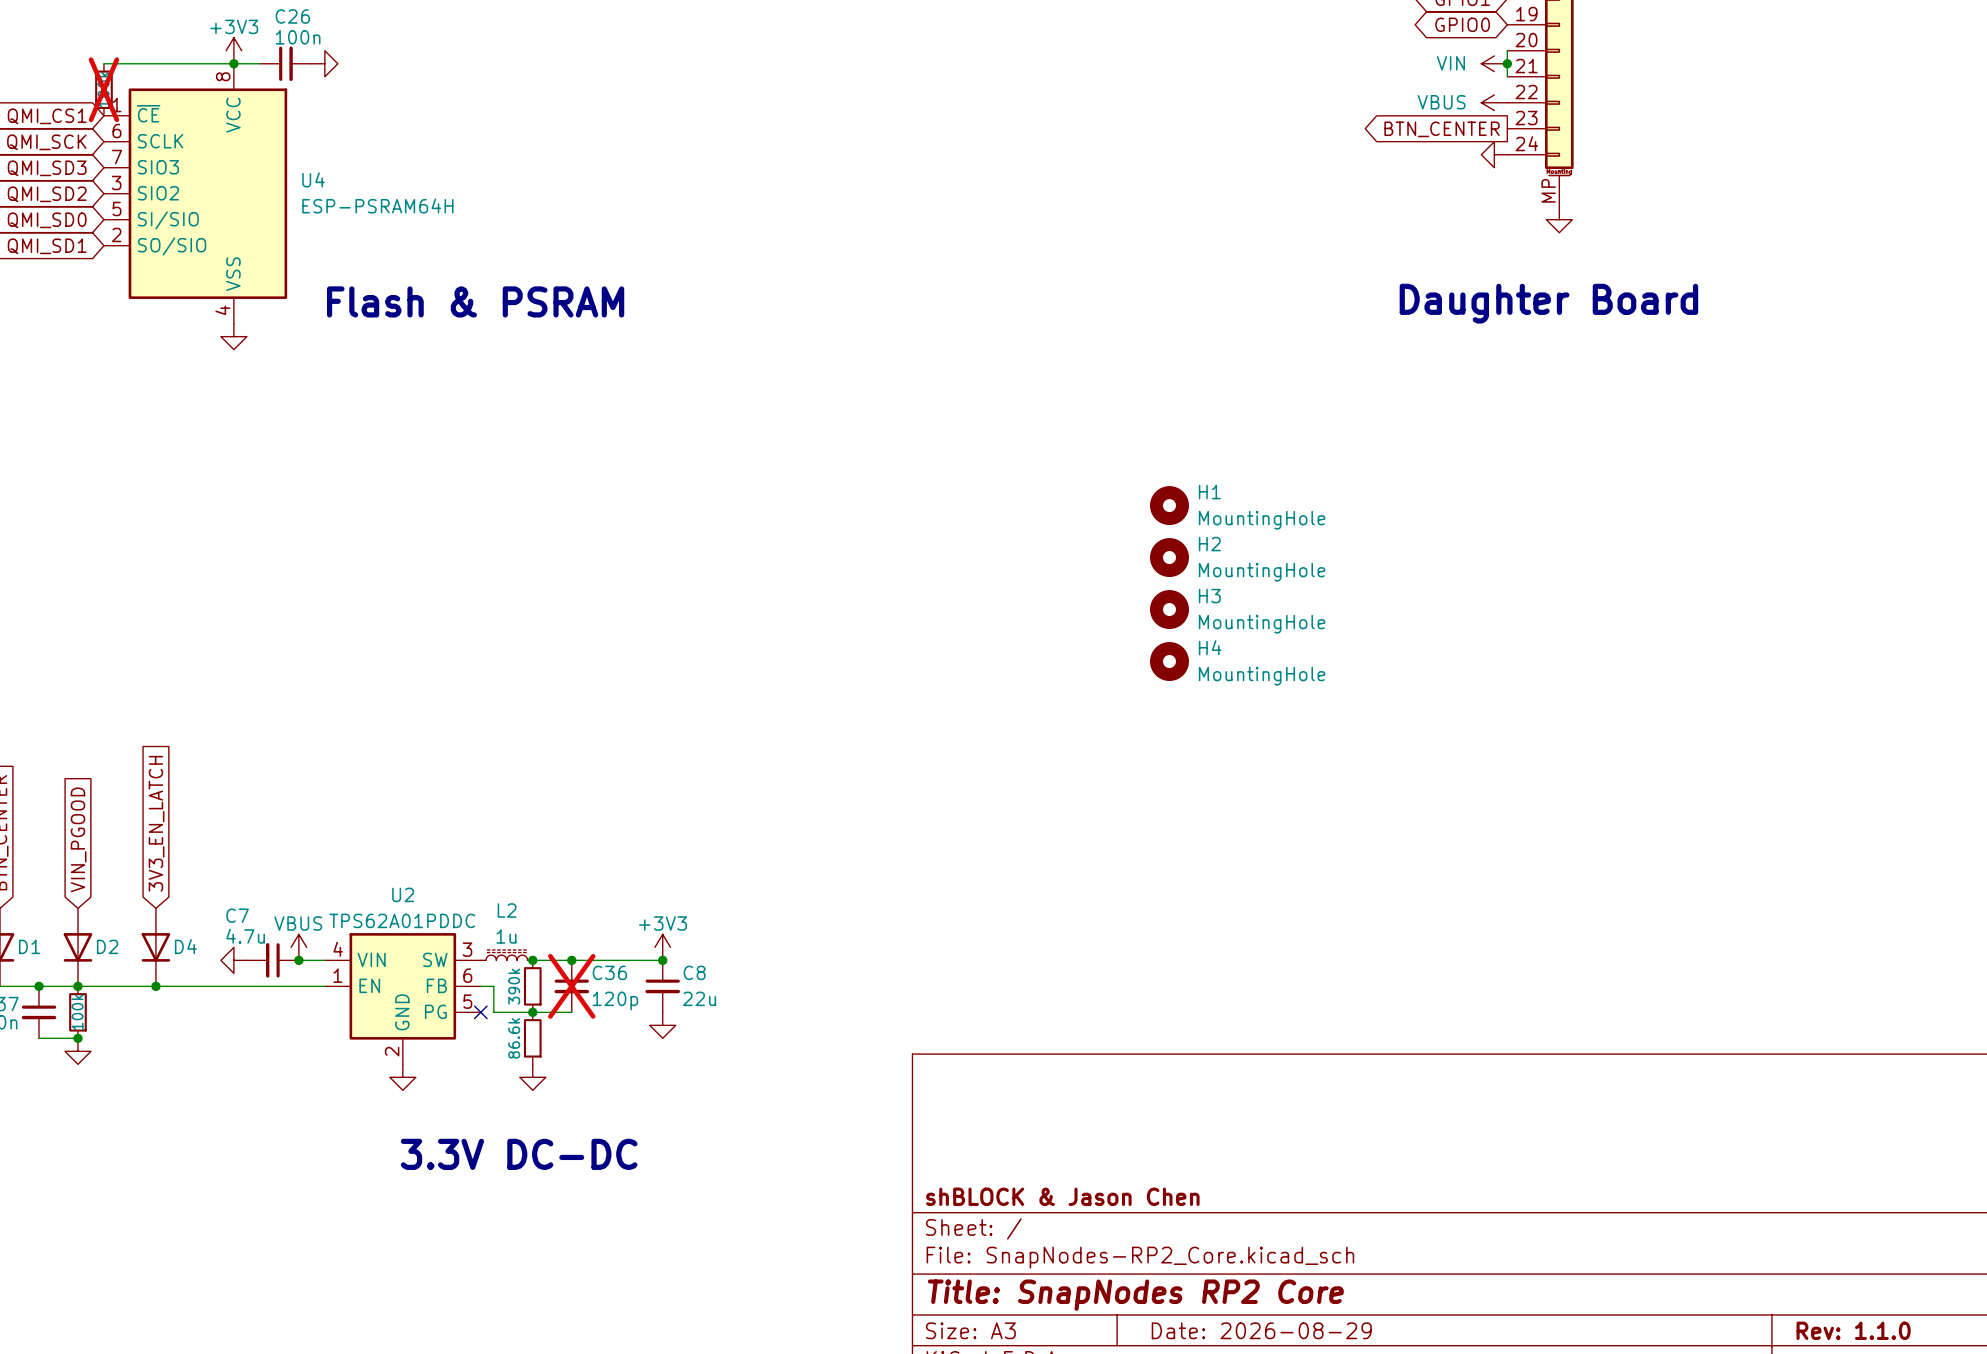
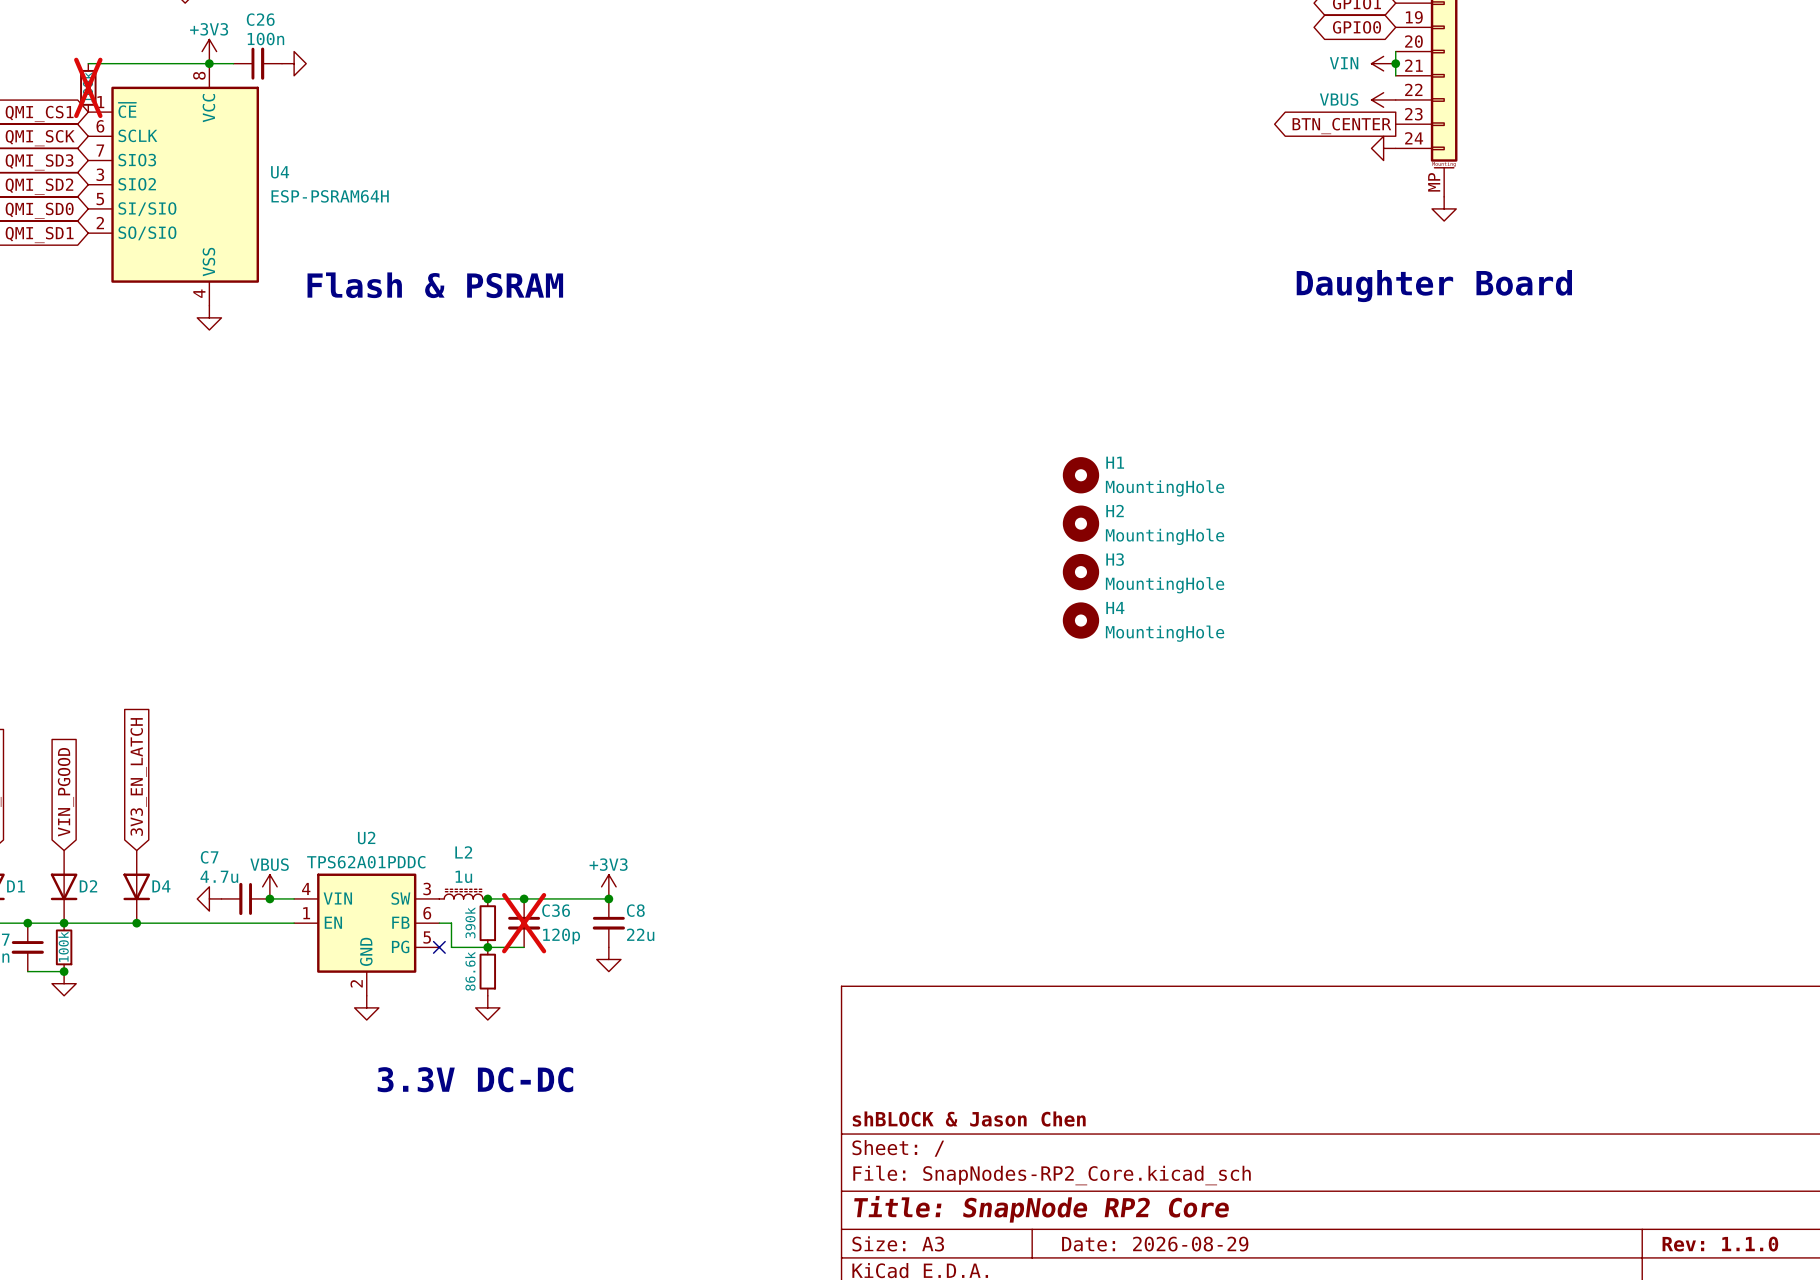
title block: Title: SnapNodes RP2 Core (1135, 1295) -> Title: SnapNode RP2 Core (1041, 1209)

